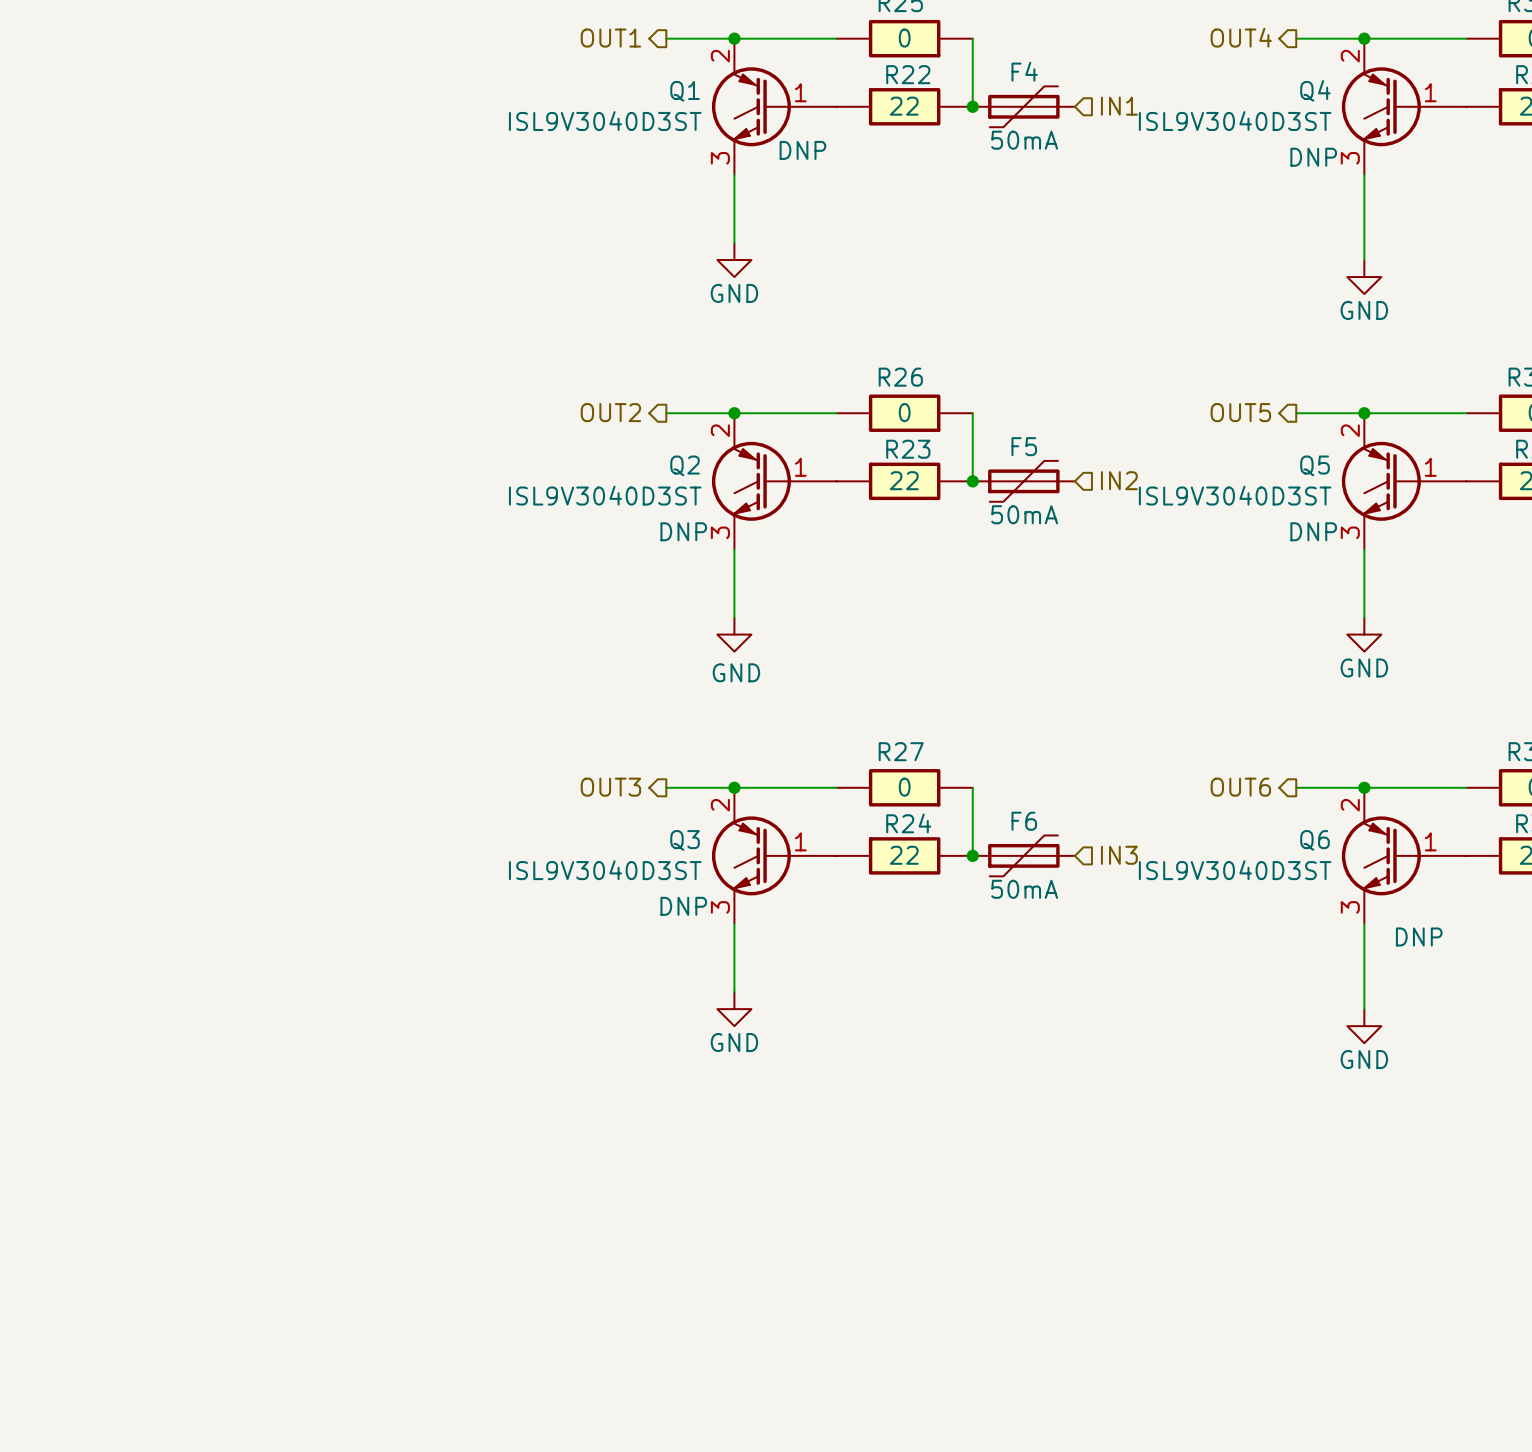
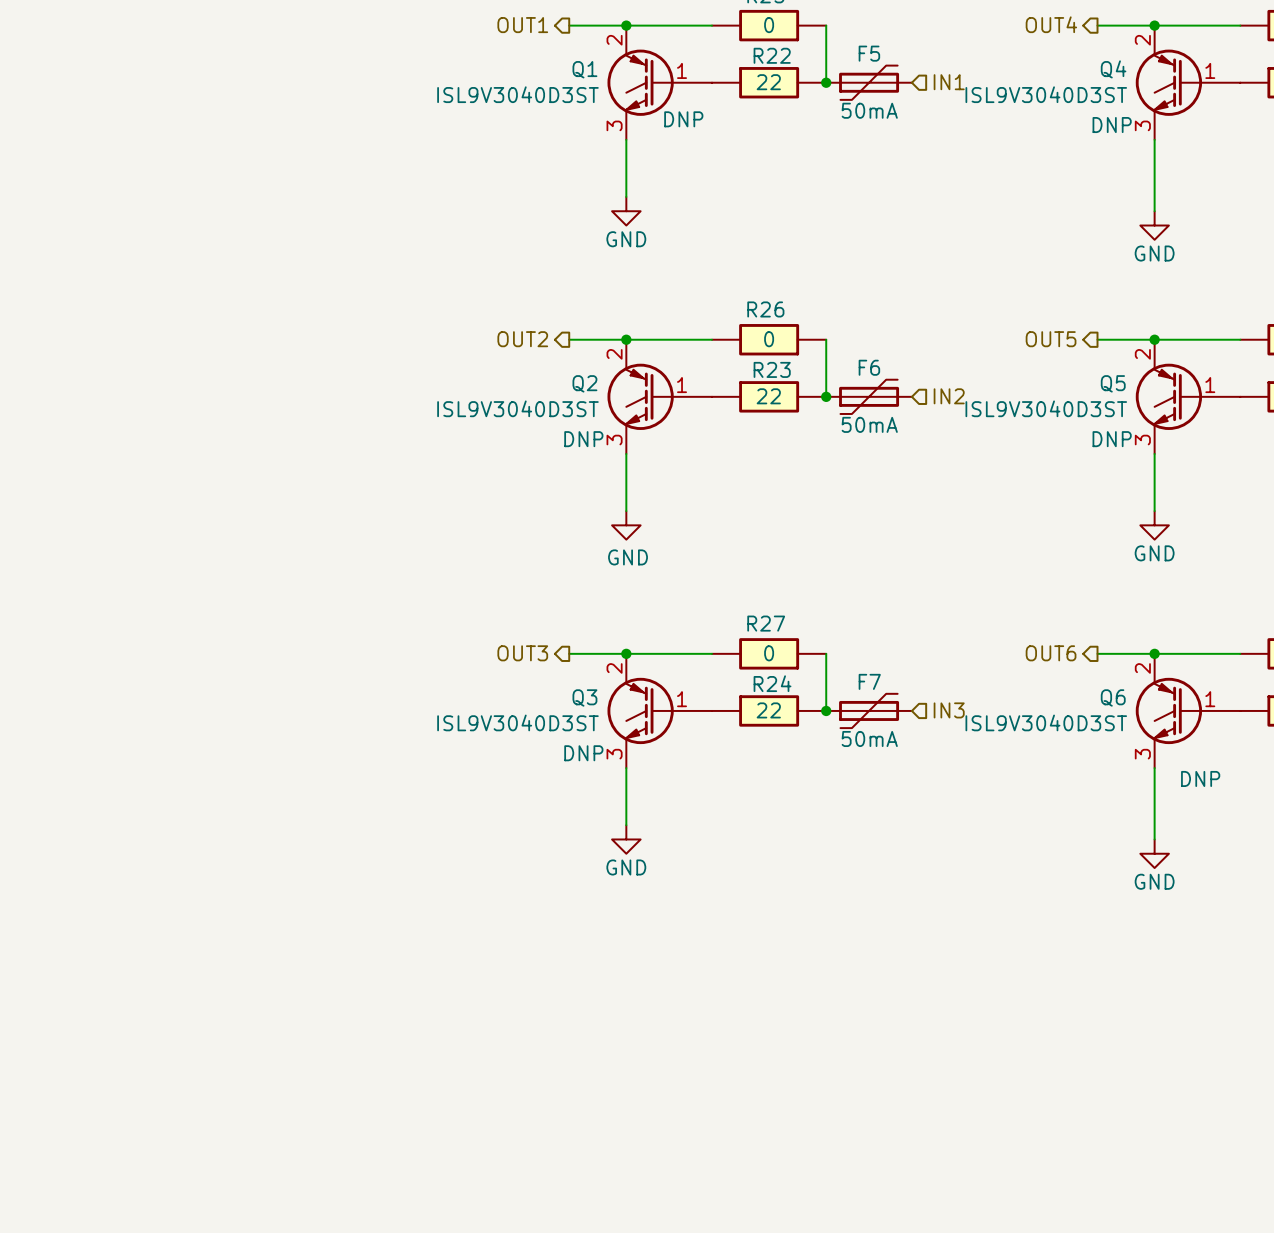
F4 name: F4 (1024, 71) -> F5 (869, 53)
F5 name: F5 (1024, 446) -> F6 (869, 367)
F6 name: F6 (1024, 821) -> F7 (869, 681)

